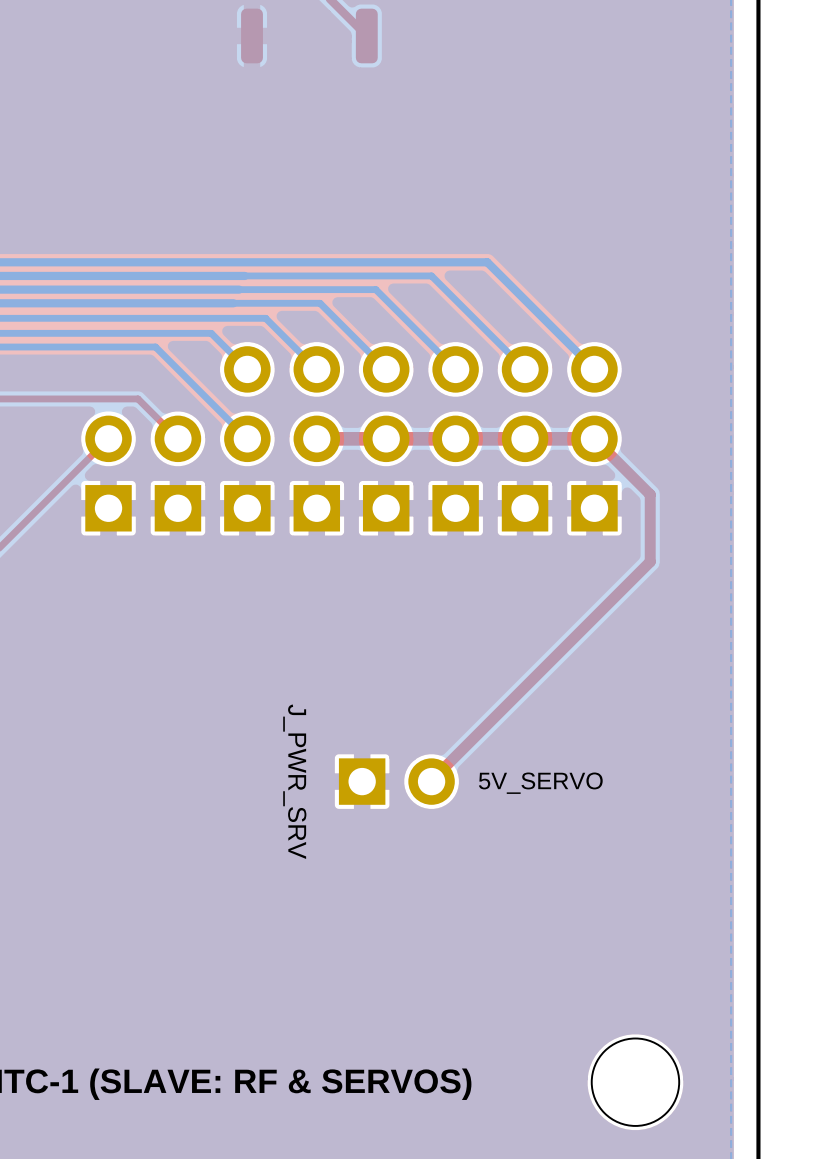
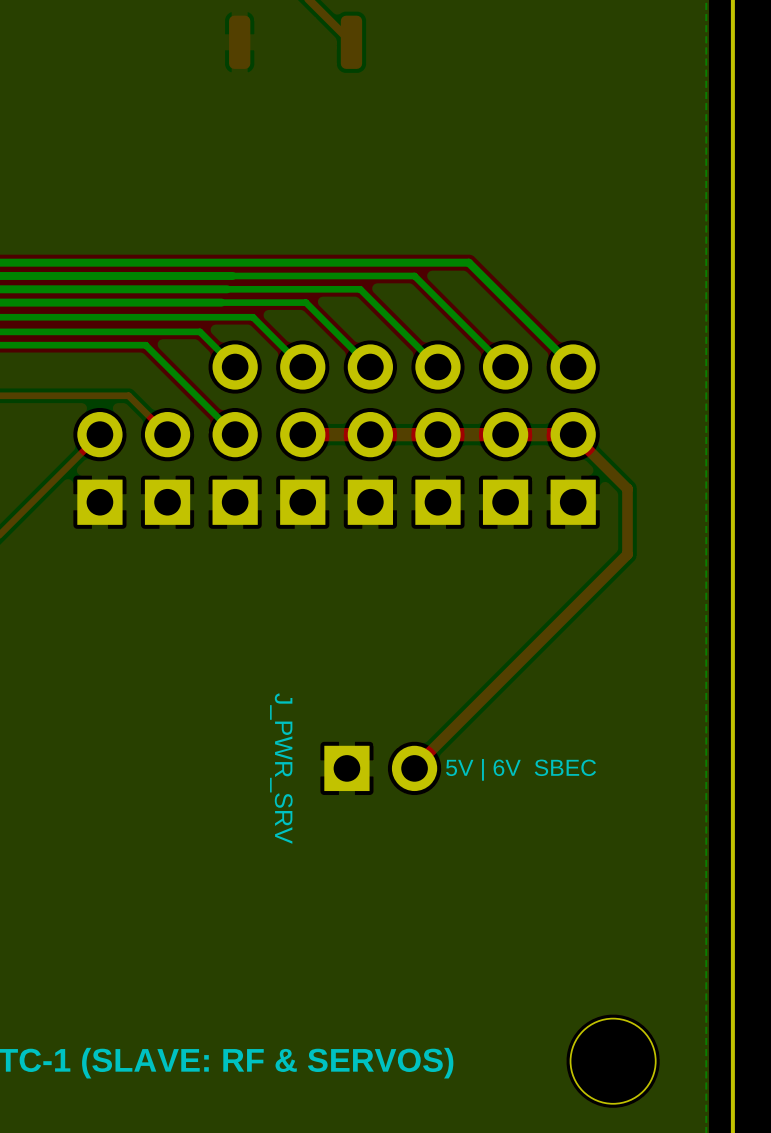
J_PWR_SRV value: 5V_SERVO (540, 783) -> 5V | 6V SBEC (521, 769)

